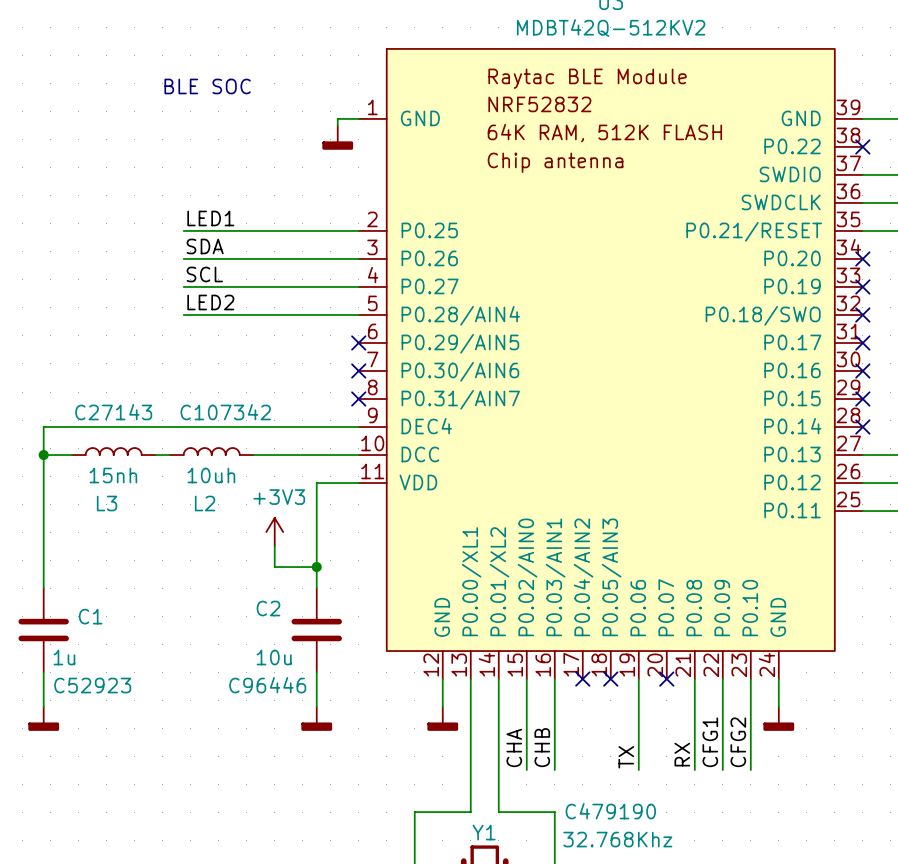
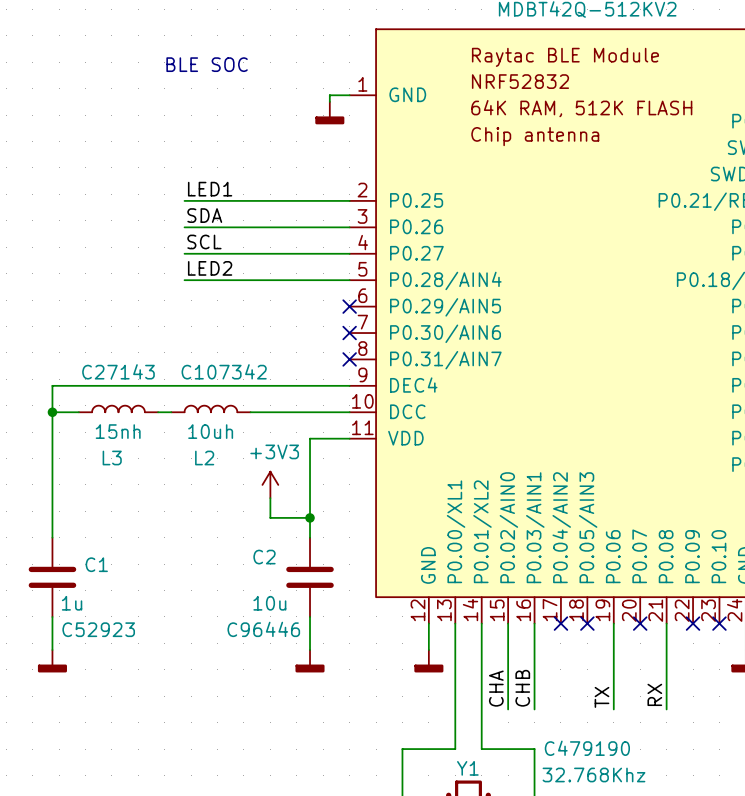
wire: (722, 679) (722, 770) -> none
no-connect mark: none -> (693, 623)
wire: (750, 679) (750, 770) -> none
no-connect mark: none -> (719, 623)
label: CFG1 (710, 742) -> none
label: CFG2 (738, 742) -> none

